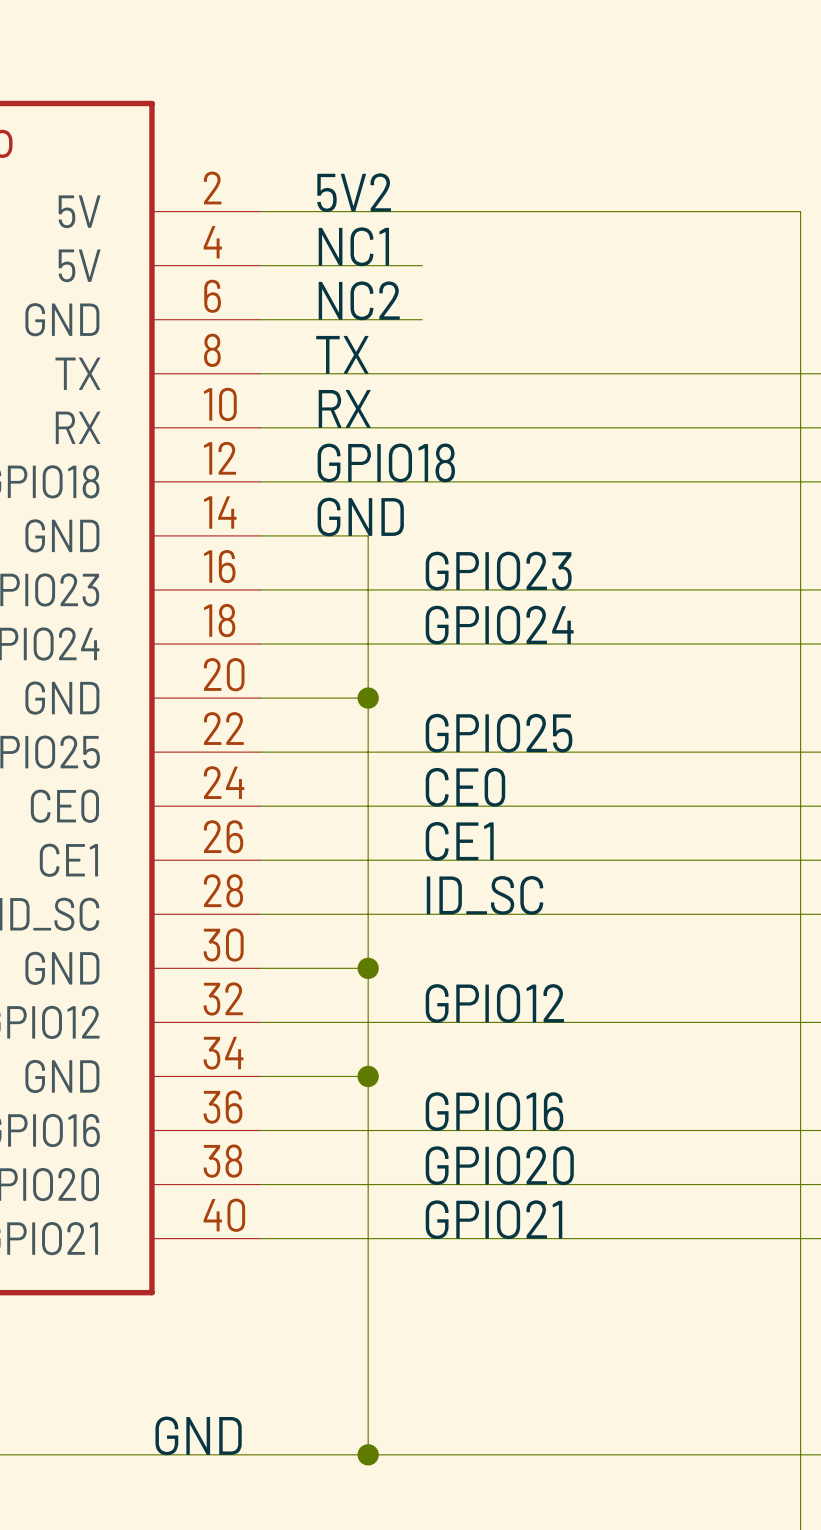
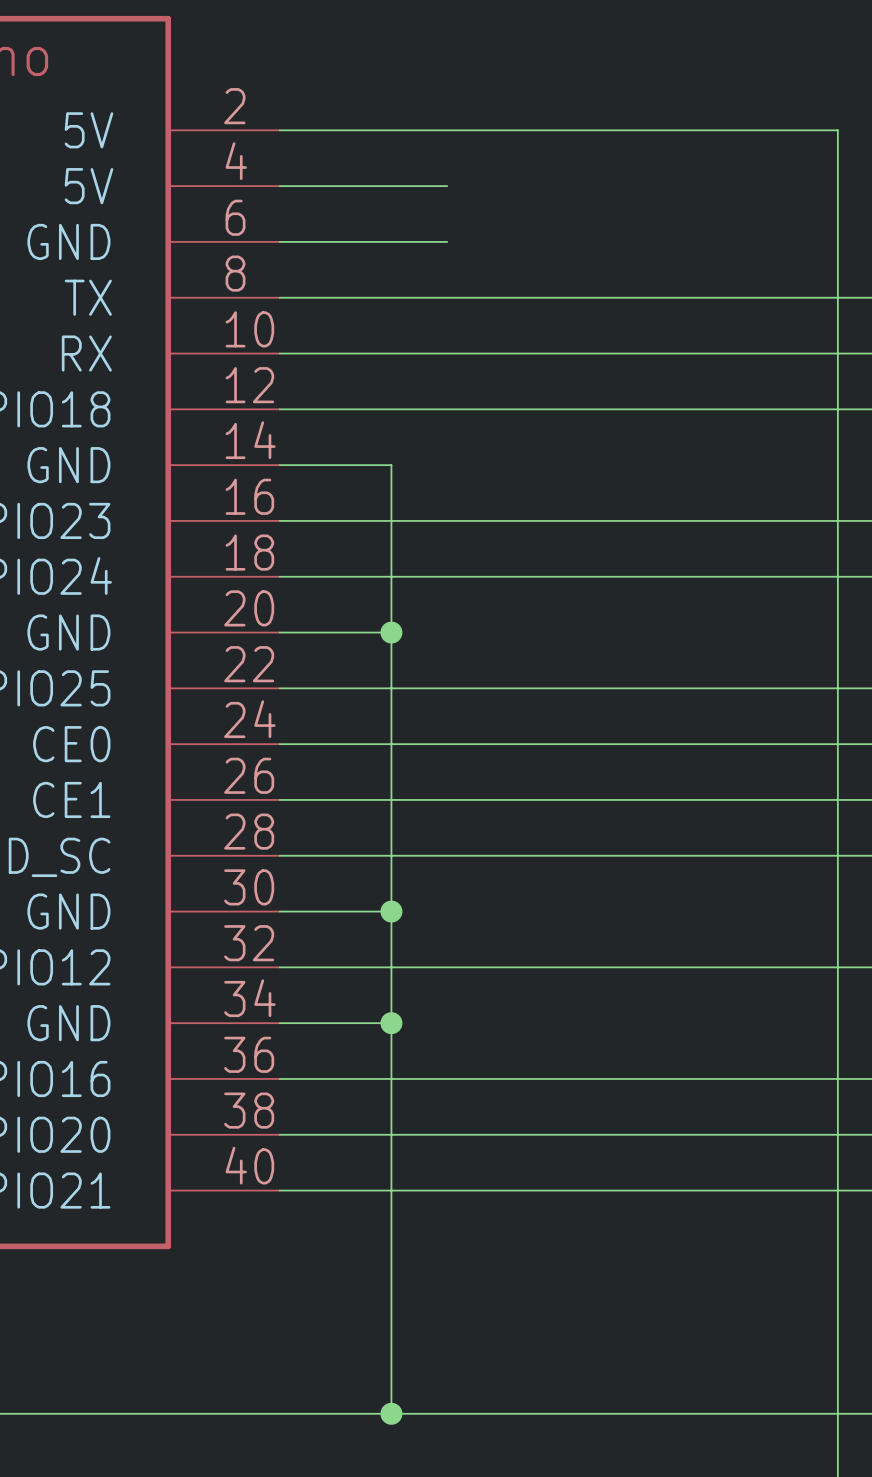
label: 5V2 (354, 192) -> none
label: NC1 (353, 246) -> none
label: NC2 (359, 300) -> none
label: TX (342, 354) -> none
label: RX (344, 408) -> none
label: GPIO18 (386, 462) -> none
label: GND (360, 517) -> none
label: GPIO23 (498, 571) -> none
label: GPIO24 (499, 625) -> none
label: GPIO25 (499, 733) -> none
label: CE0 (465, 787) -> none
label: CE1 (459, 841) -> none
label: ID_SC (485, 895) -> none
label: GPIO12 (494, 1003) -> none
label: GPIO16 (494, 1111) -> none
label: GPIO20 (499, 1165) -> none
label: GPIO21 (494, 1219) -> none
label: GND (198, 1435) -> none

